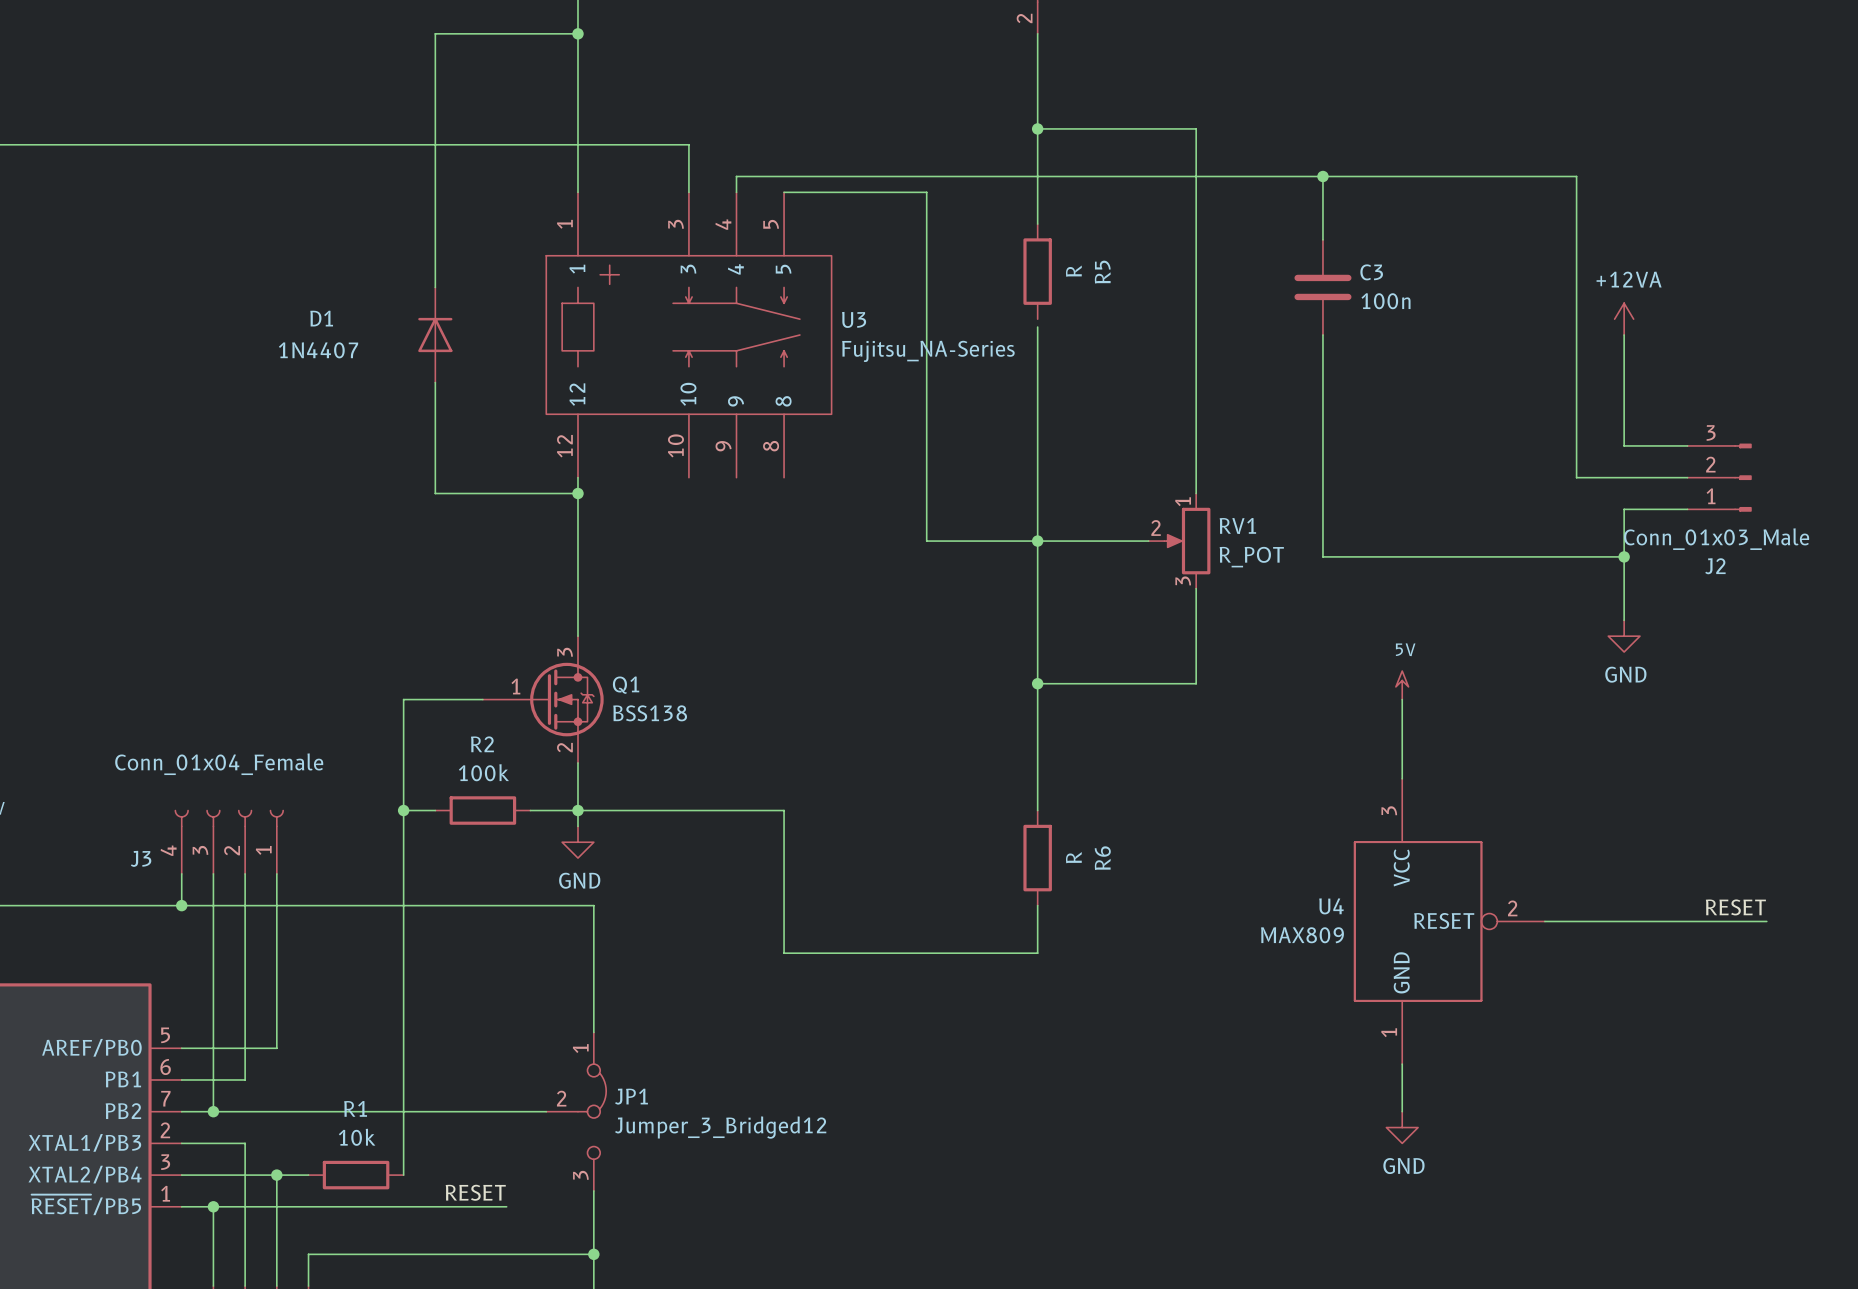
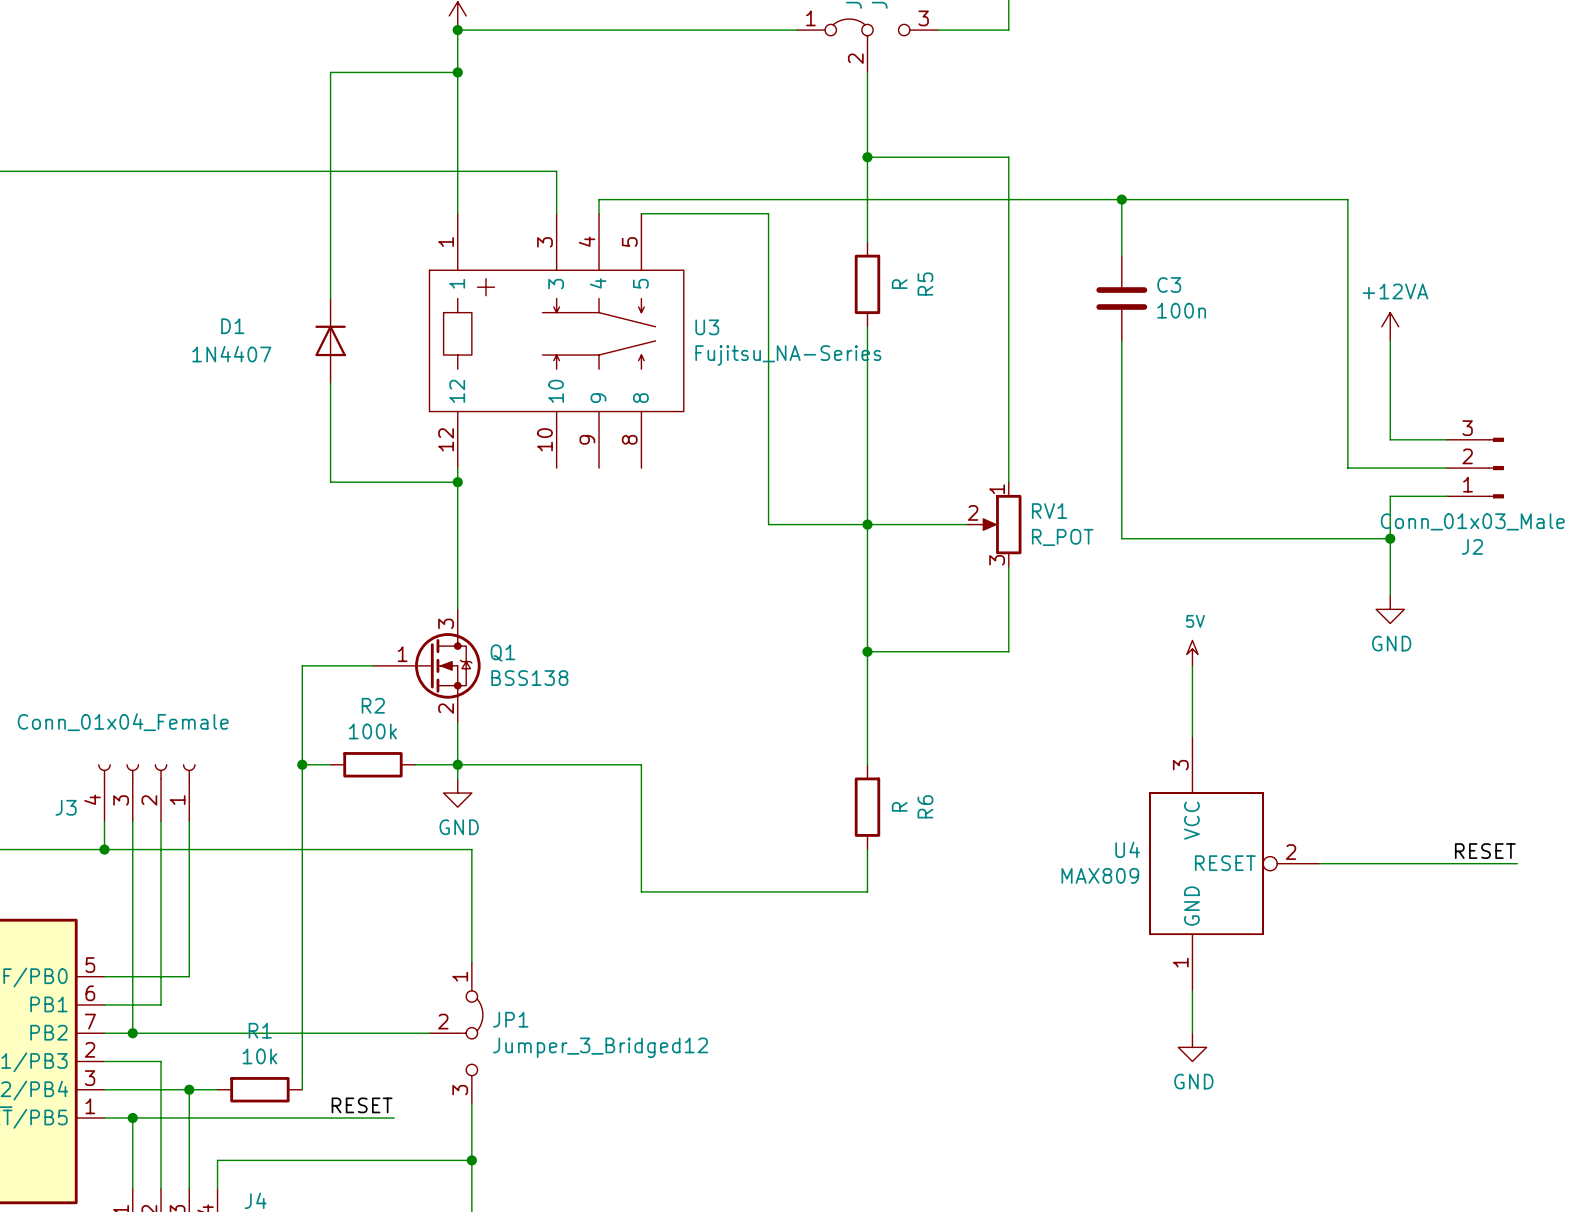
wire: none -> (867, 326) (867, 333)

